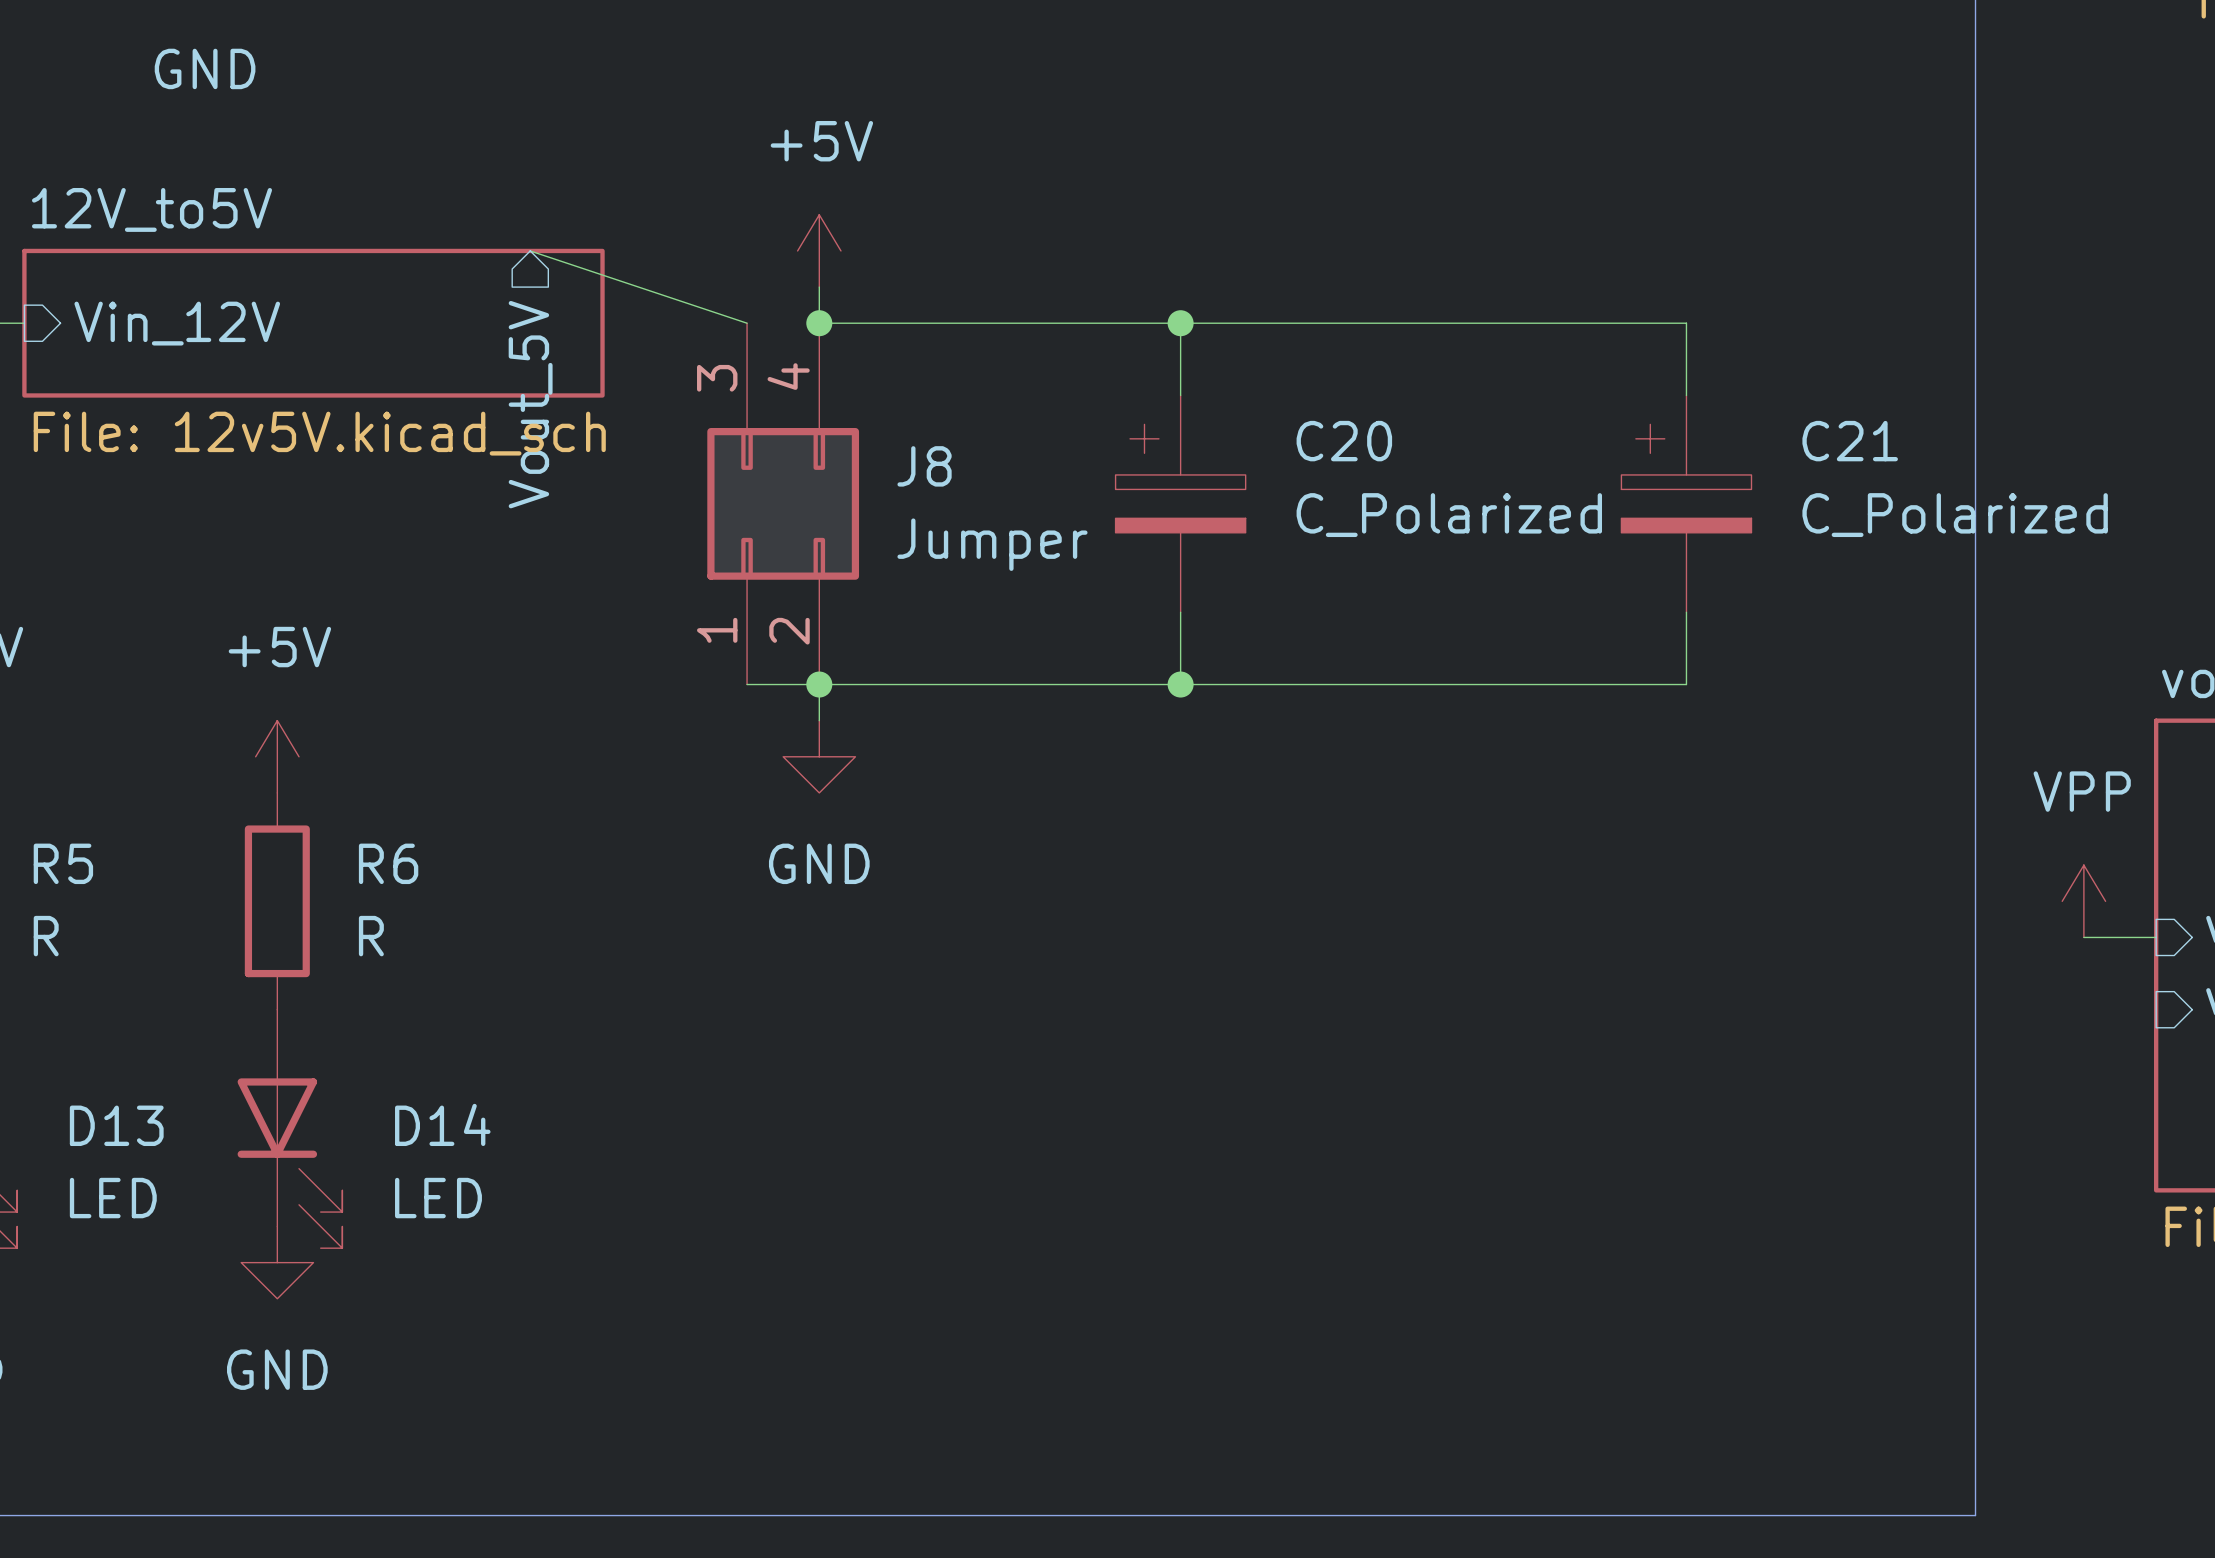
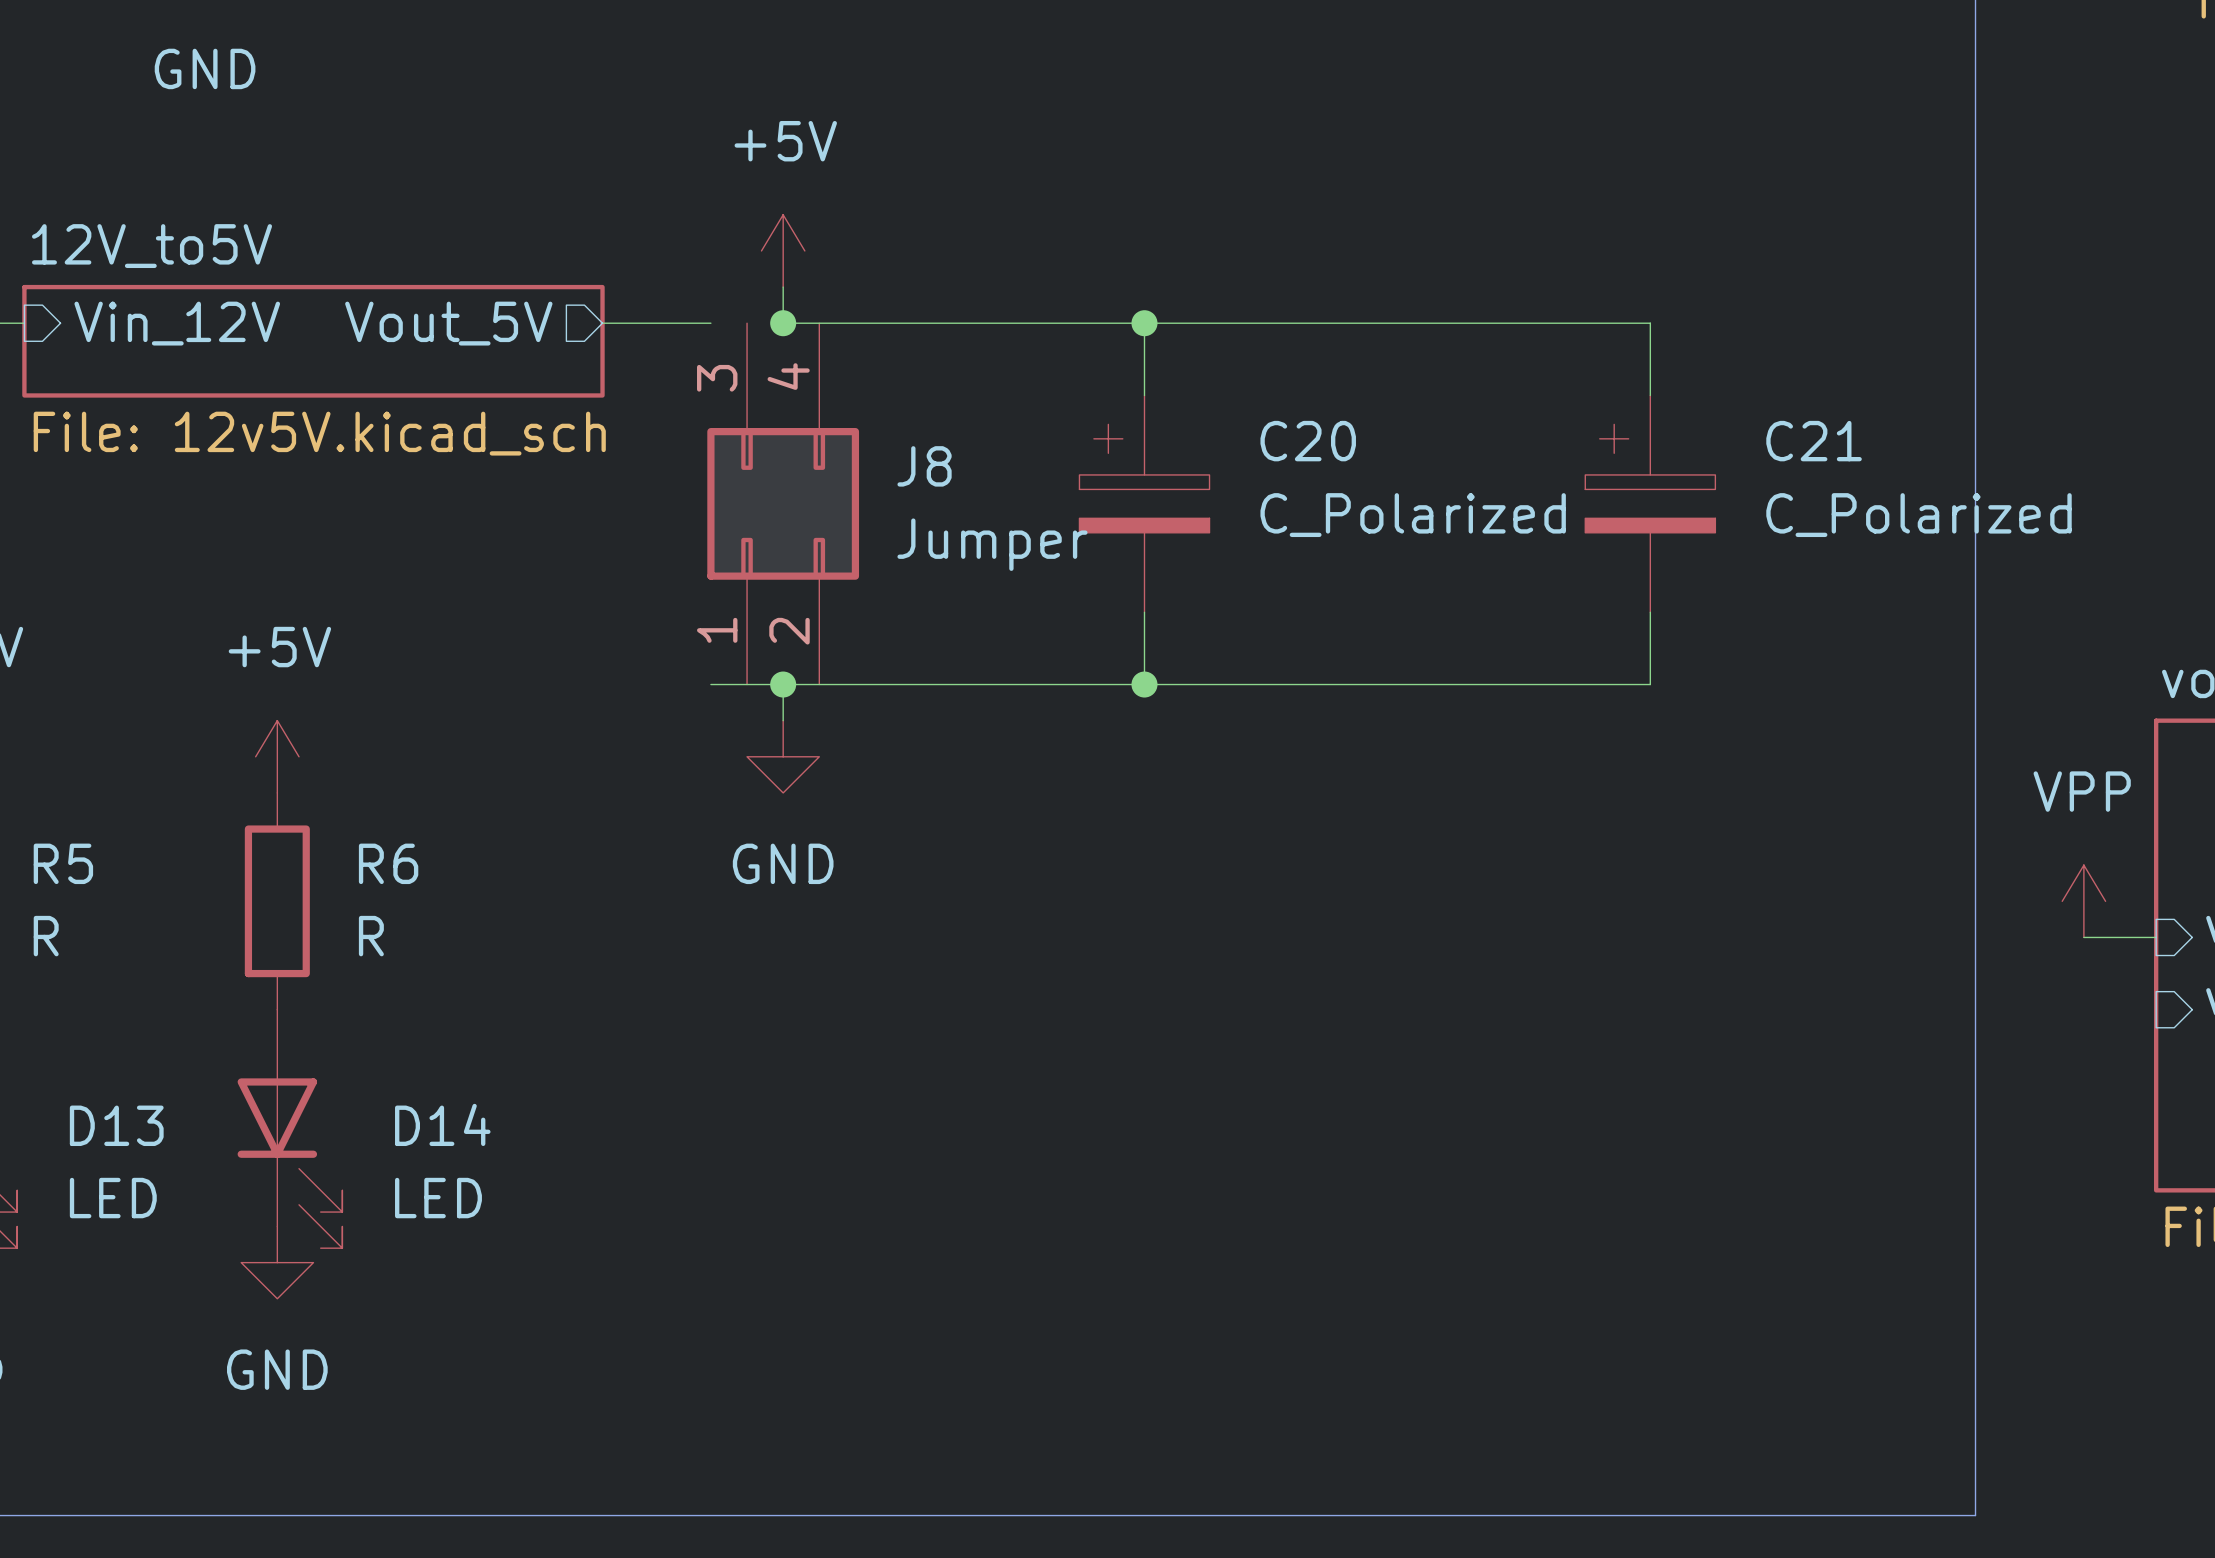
sheet 12V_to5V shape: [22, 248, 605, 398] -> [22, 284, 605, 398]
wire: (530, 250) (747, 323) -> none
power symbol position: +5V (819, 250) -> +5V (783, 250)
wire: (819, 287) (819, 323) -> (783, 287) (783, 323) (819, 323)
wire: none -> (602, 323) (710, 323)
junction position: (819, 323) -> (783, 323)
wire: (1180, 323) (1180, 395) -> (1144, 323) (1144, 395)
junction position: (1180, 323) -> (1144, 323)
wire: (1650, 323) (1686, 323) (1686, 395) -> (1650, 323) (1650, 395)
sheet pin rotation: 0° (530, 404) -> 90° clockwise (448, 323)
C20 position: (1180, 503) -> (1144, 503)
C21 position: (1686, 503) -> (1650, 503)
wire: (1180, 612) (1180, 684) -> (1144, 612) (1144, 684)
wire: (1686, 612) (1686, 684) (1650, 684) -> (1650, 612) (1650, 684)
wire: none -> (710, 684) (747, 684)
wire: (819, 684) (819, 720) -> (783, 684) (783, 720)
junction position: (819, 684) -> (783, 684)
junction position: (1180, 684) -> (1144, 684)
power symbol position: GND (819, 756) -> GND (783, 756)

